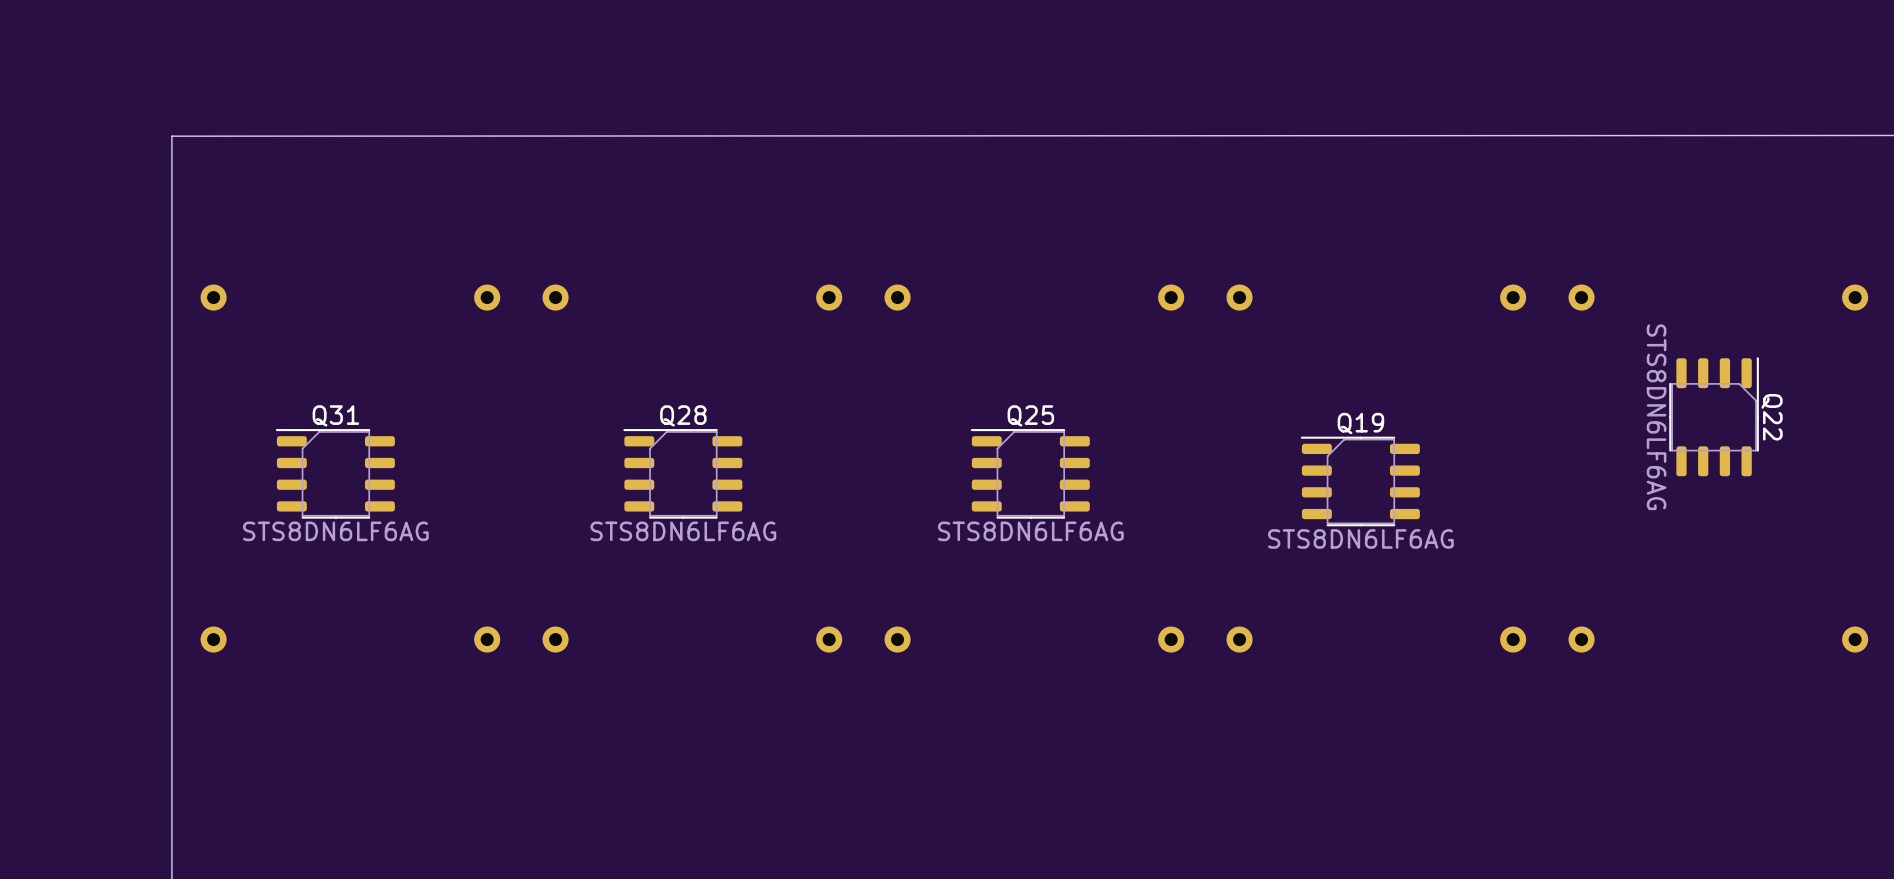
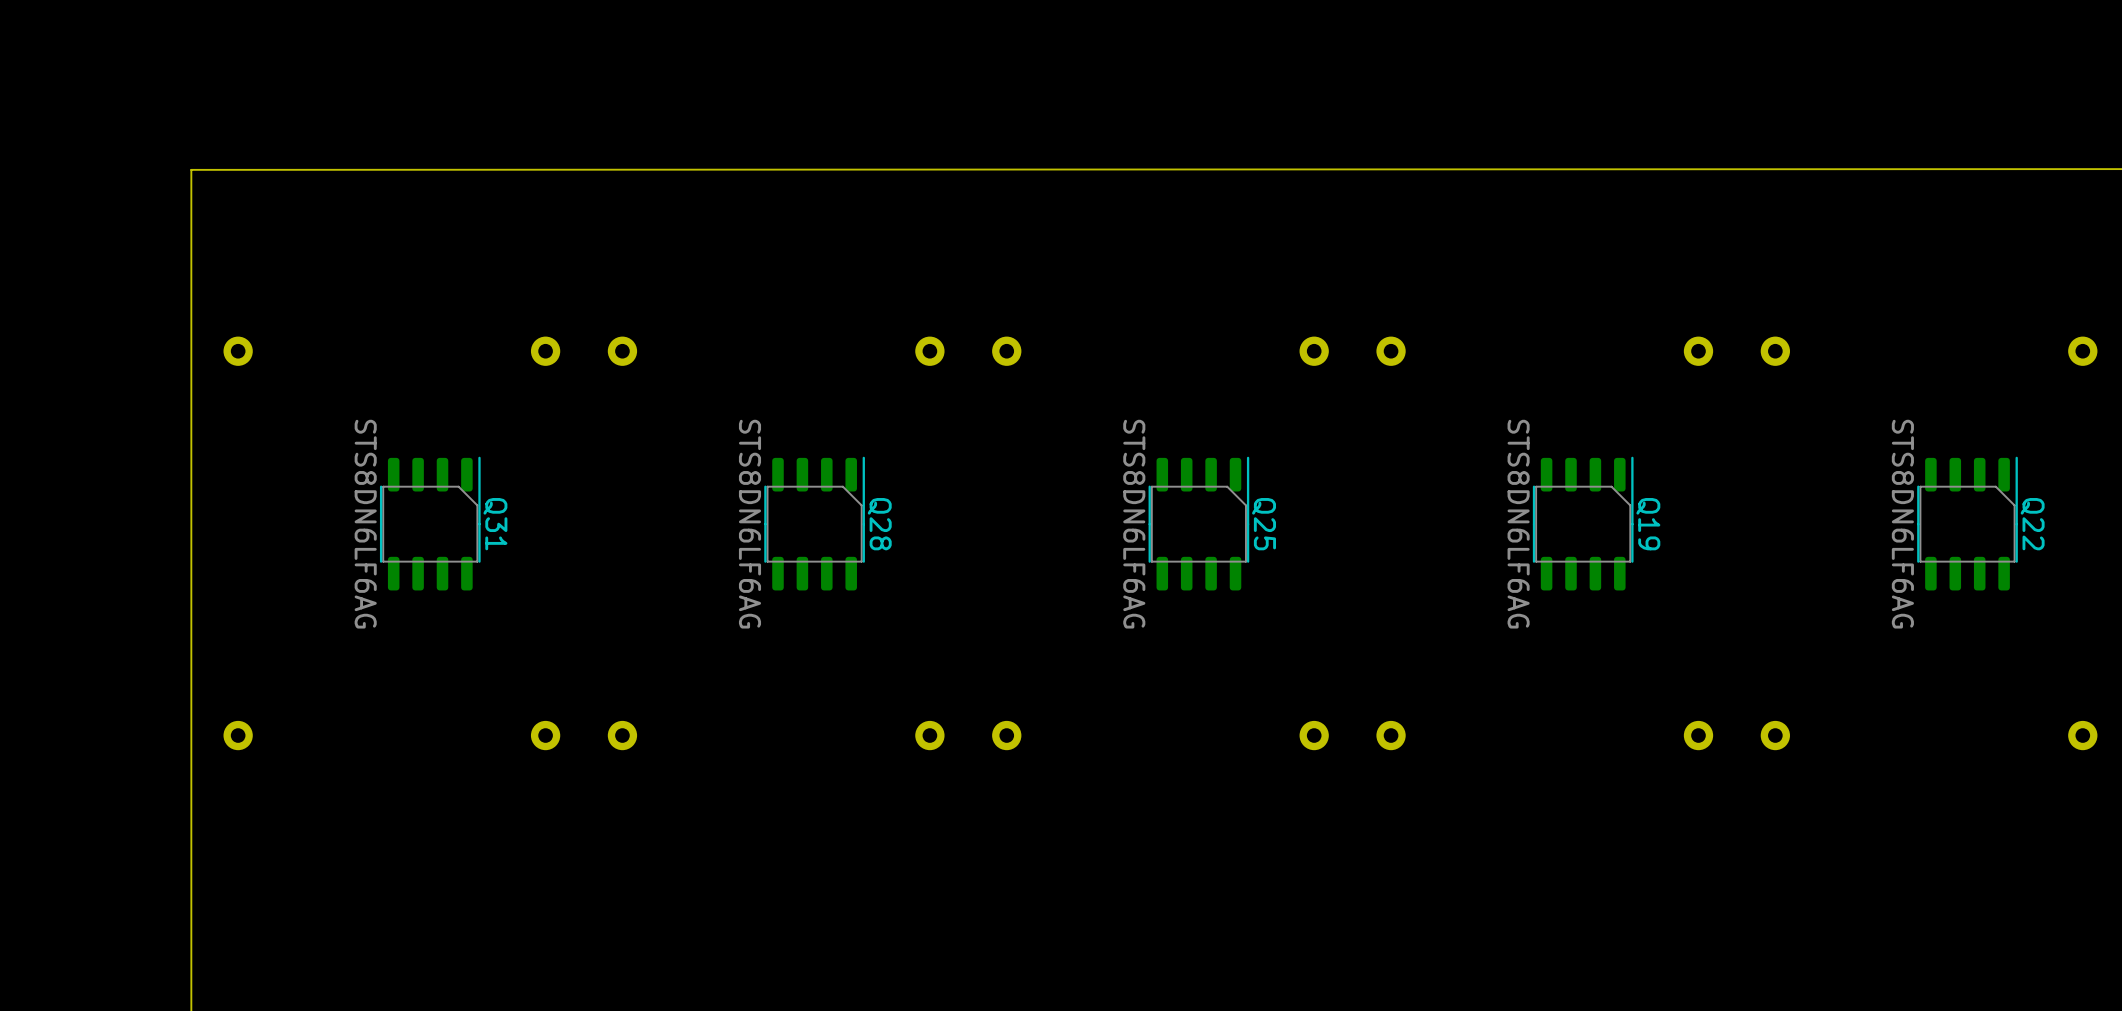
Q22 position: (1714, 416) -> (1967, 523)
Q31 rotation: 0° (335, 473) -> 90° clockwise (430, 523)
Q28 rotation: 0° (682, 473) -> 90° clockwise (814, 523)
Q25 rotation: 0° (1030, 473) -> 90° clockwise (1198, 523)
Q19 rotation: 0° (1360, 481) -> 90° clockwise (1583, 523)

